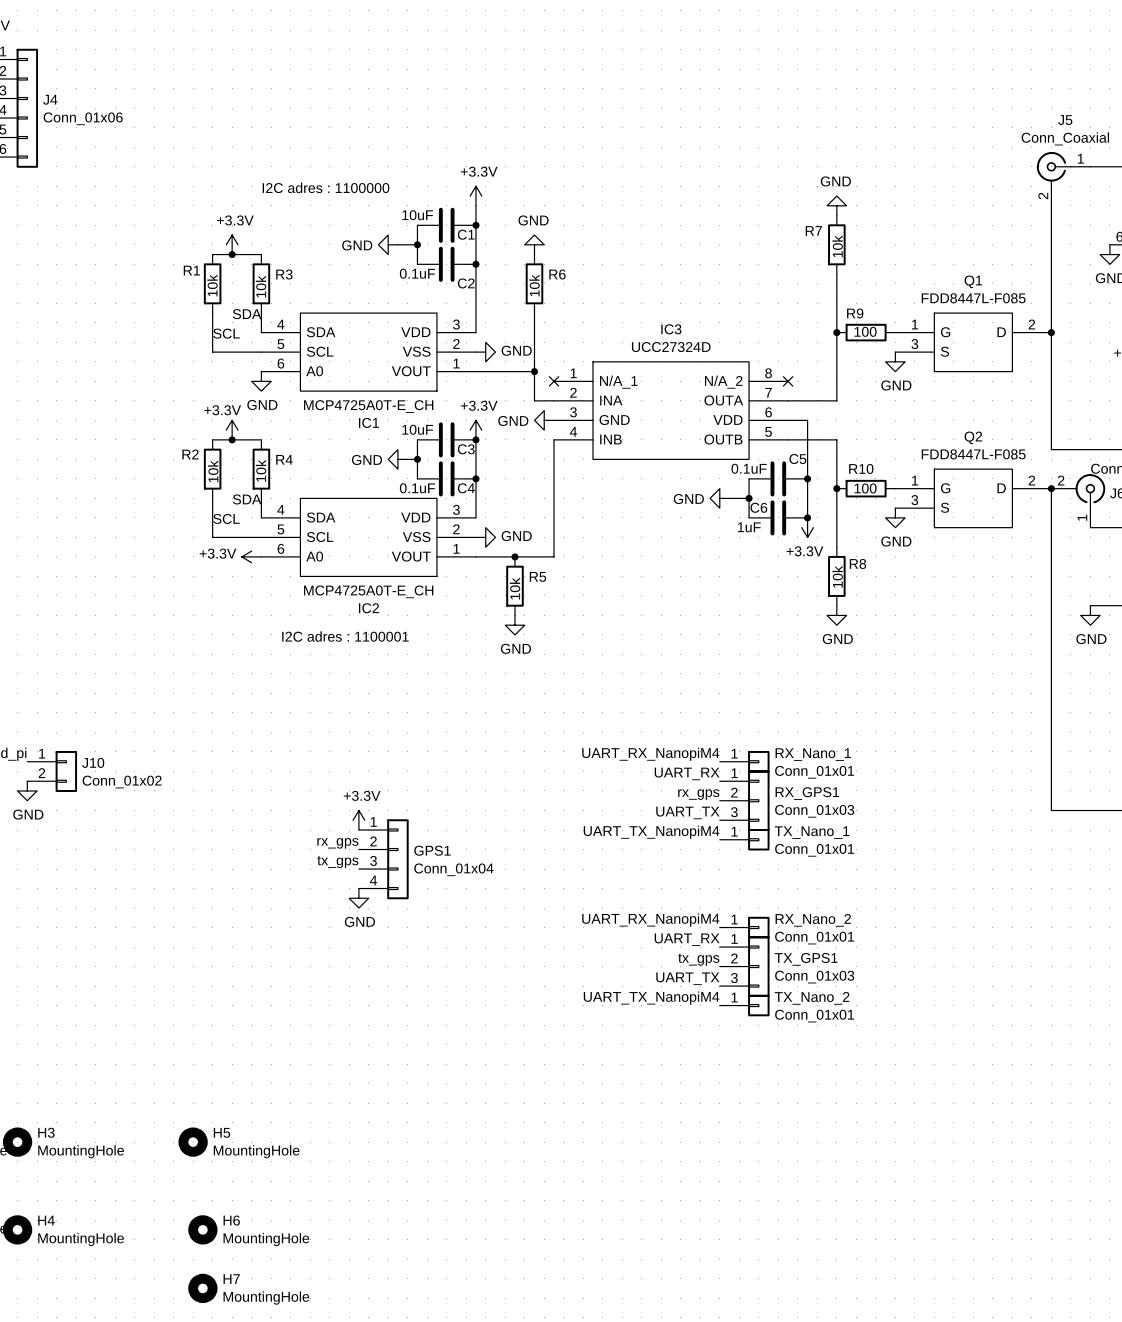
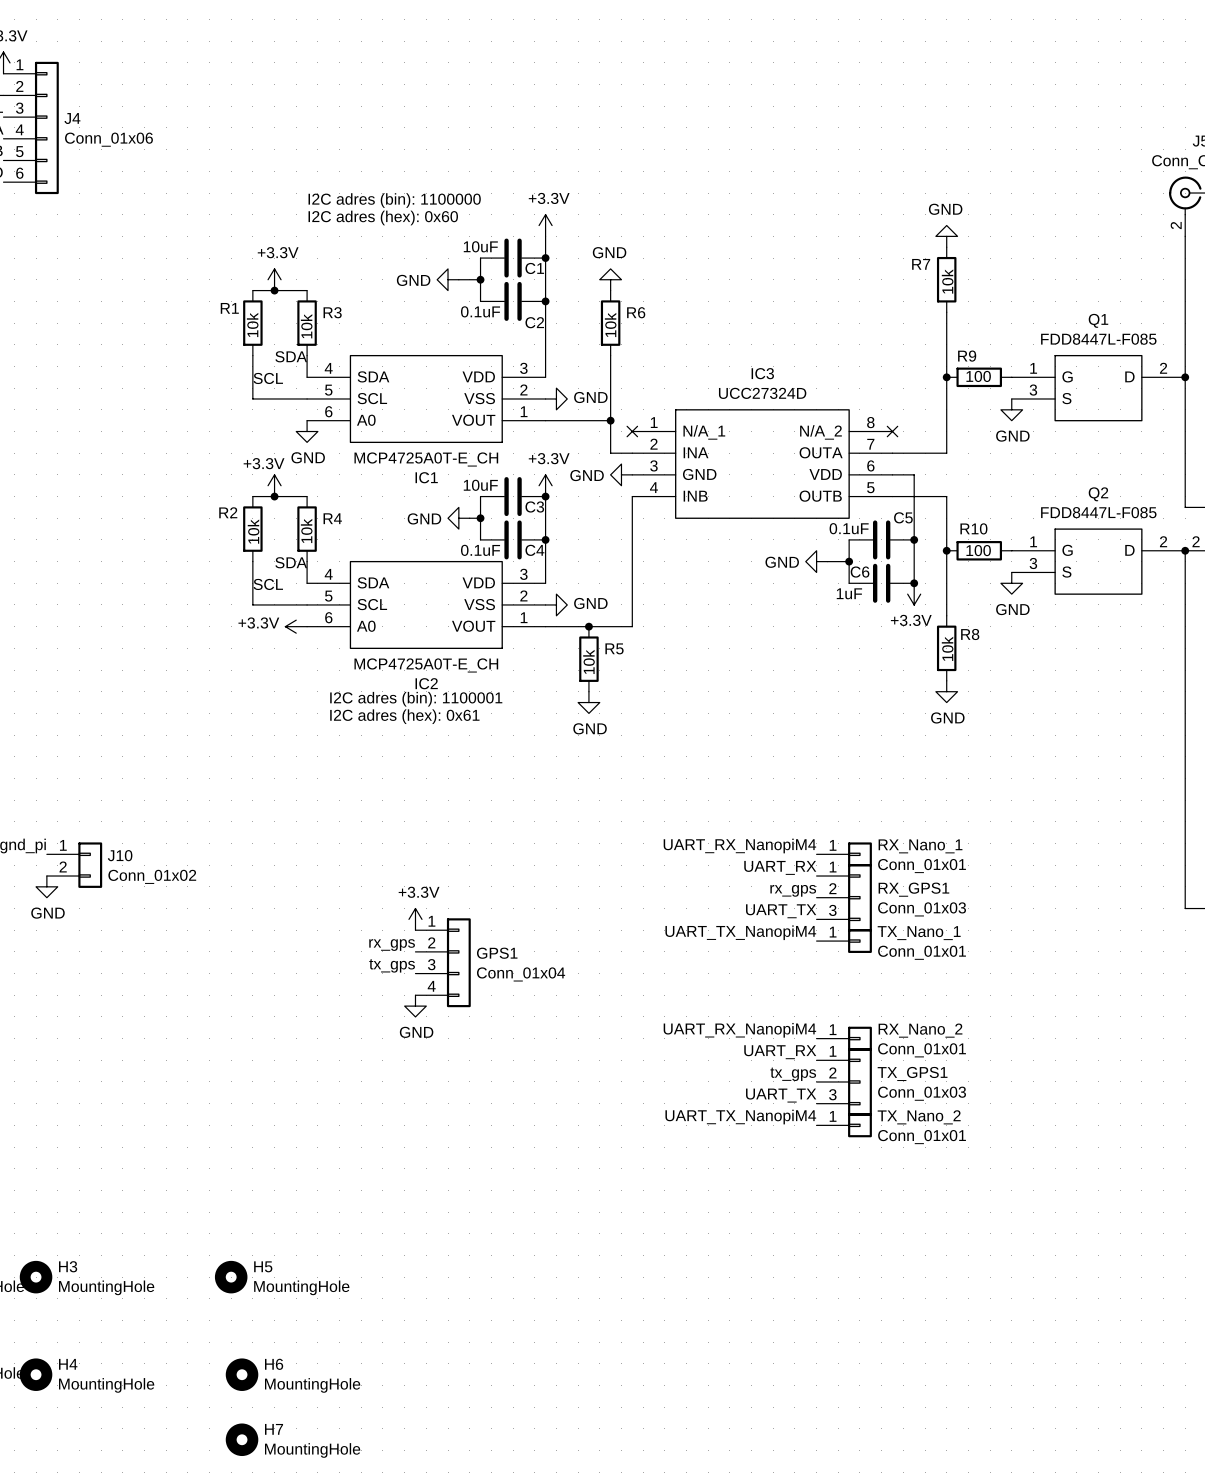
text: none -> I2C adres (bin): 1100000 (394, 200)
text: I2C adres : 1100000 (326, 187) -> I2C adres (hex): 0x60 (383, 217)
text: none -> I2C adres (bin): 1100001 (416, 699)
text: I2C adres : 1100001 (345, 636) -> I2C adres (hex): 0x61 (404, 716)

